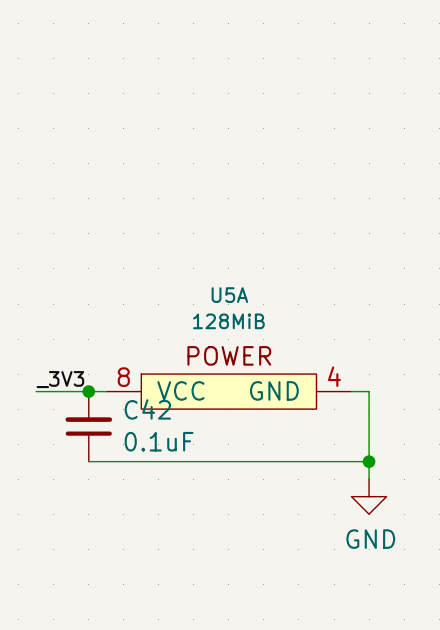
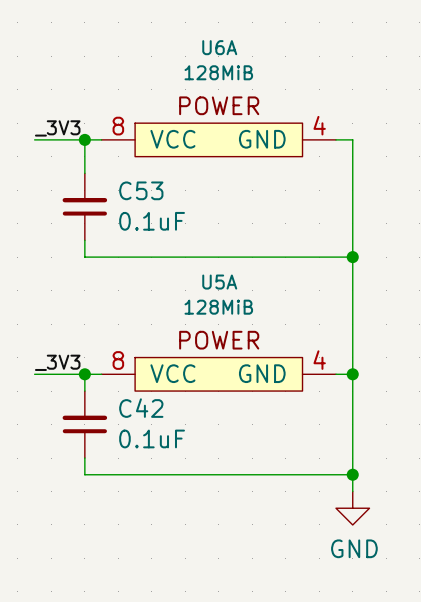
label: none -> _3V3 (57, 128)
wire: none -> (34, 139) (101, 139)
wire: none -> (84, 139) (84, 173)
junction: none -> (84, 139)
U6A: none -> 128MiB (218, 139)
wire: none -> (336, 139) (352, 139) (352, 374)
C53: none -> 0.1uF (84, 206)
wire: none -> (84, 240) (84, 257) (352, 257)
junction: none -> (352, 257)
junction: none -> (352, 374)
C42 position: (88, 426) -> (84, 424)
wire: (88, 461) (369, 461) -> none
junction: (369, 461) -> none
wire: none -> (84, 458) (84, 474) (352, 474)
power symbol position: GND (369, 496) -> GND (352, 508)
junction: none -> (352, 474)

